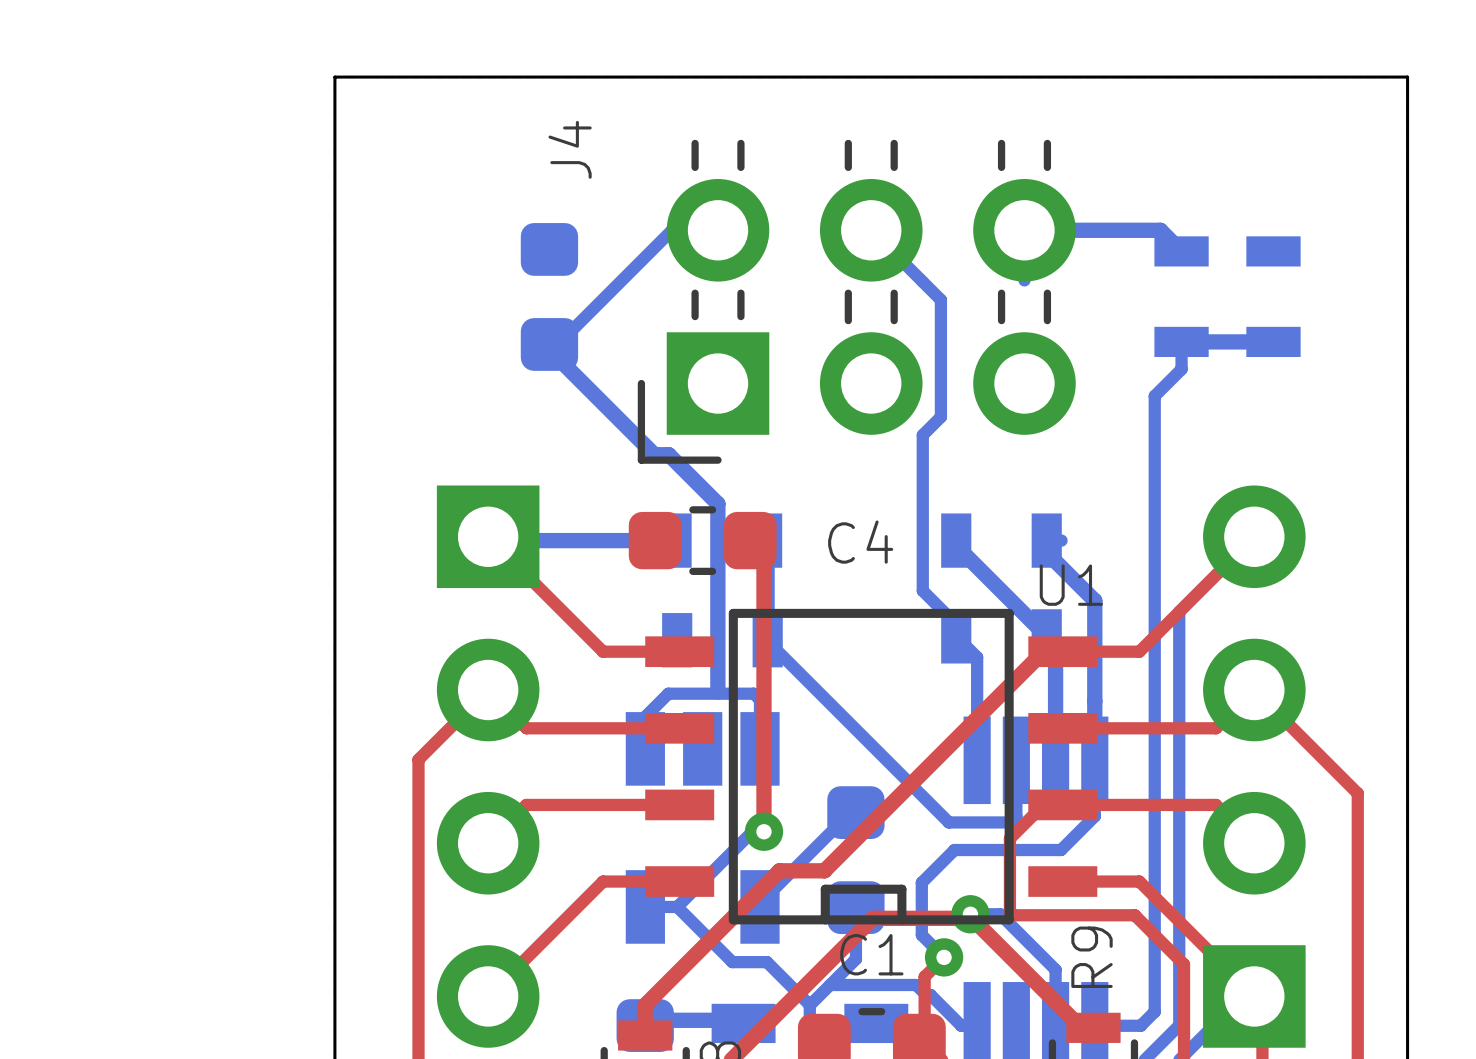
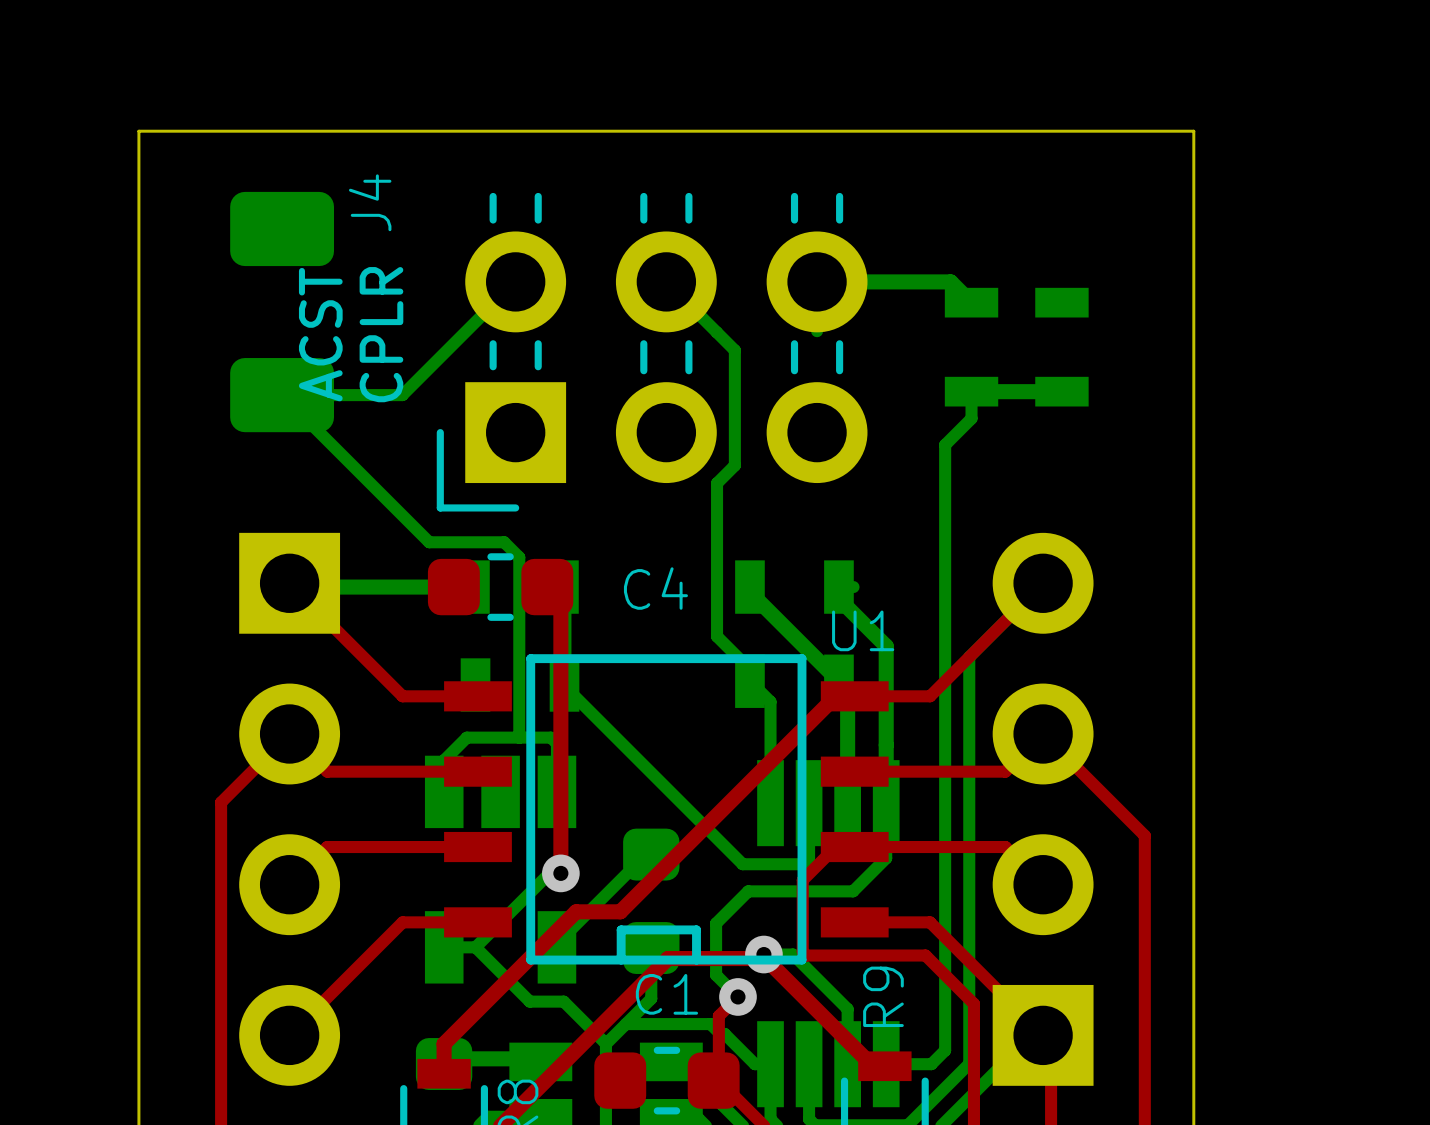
bottom track: (718, 230) (672, 230) (552, 349) (549, 349) (654, 454) (668, 454) (717, 503) (717, 692) -> (515, 281) (402, 395) (282, 395) (429, 542) (504, 542) (519, 557) (519, 737)
part: none -> (282, 312)
text: none -> ACST (320, 334)
text: none -> CPLR (381, 334)
part: (549, 296) -> none

